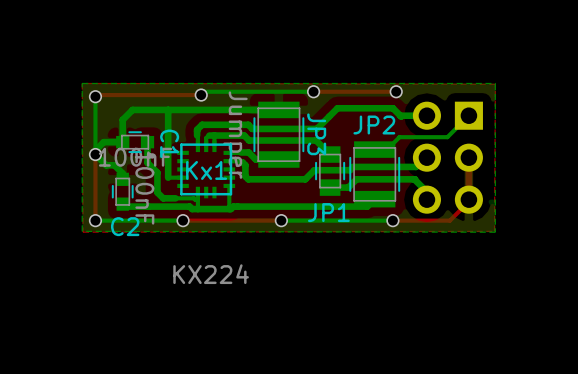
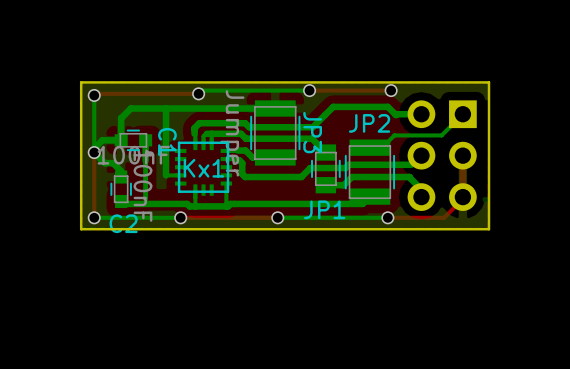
board edge: none -> (489, 82) (489, 229) (81, 229) (81, 82) (489, 82)
bottom track: (147, 162) (157, 172) (157, 192) (163, 198) (197, 199) -> (145, 160) (145, 199)
Kx1 value: KX224 (211, 274) -> none

